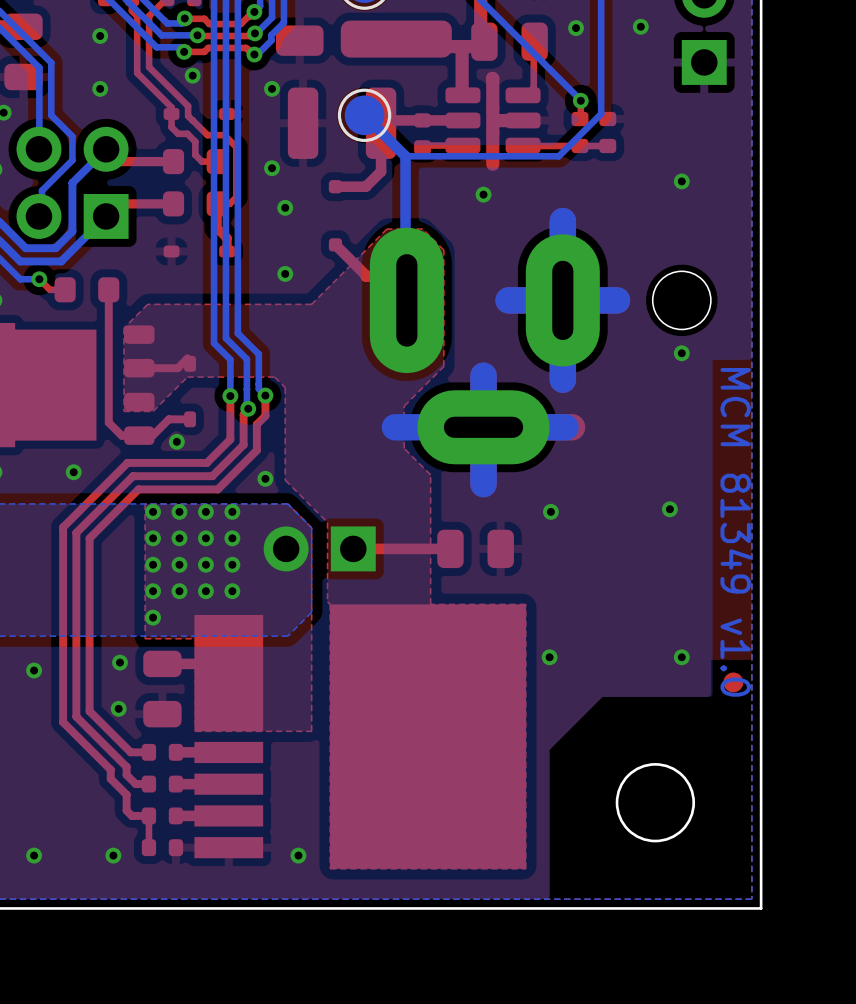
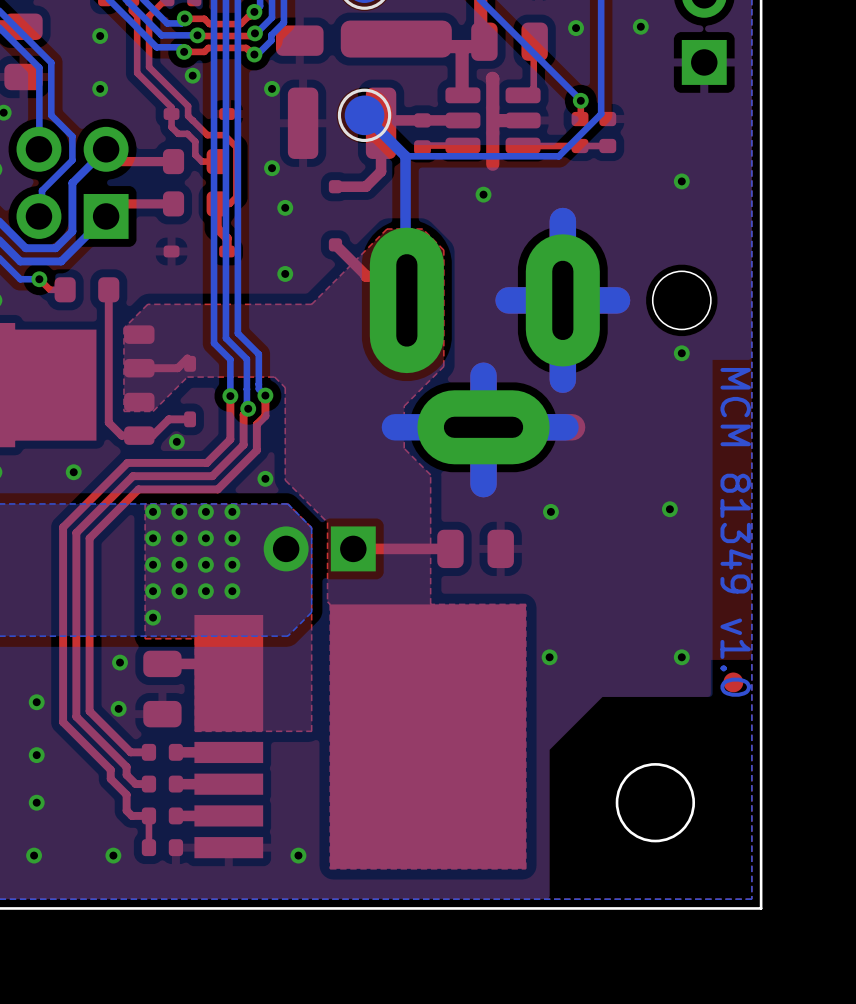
via position: (34, 670) -> (36, 702)
via: none -> (36, 755)
via: none -> (36, 802)

